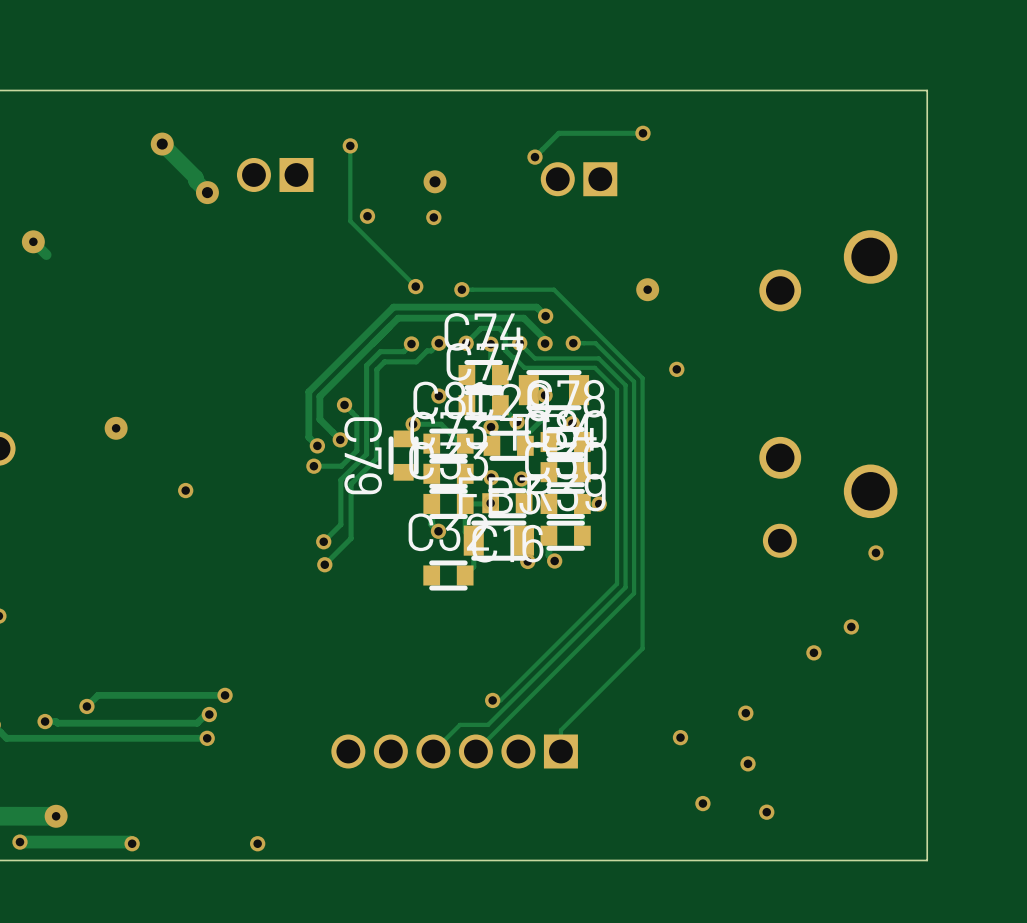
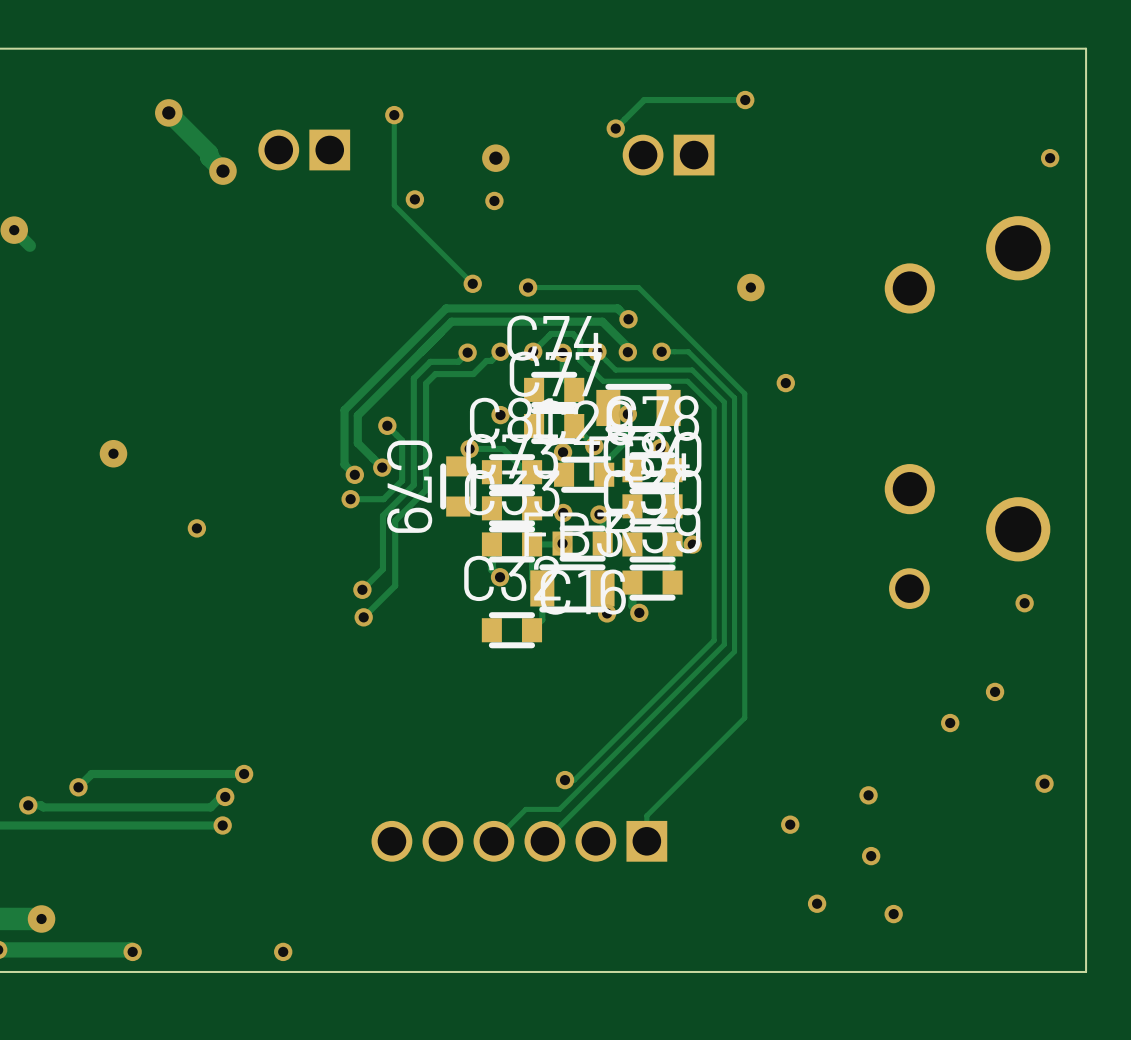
via: none -> (1050, 158)
via: none -> (1044, 783)

